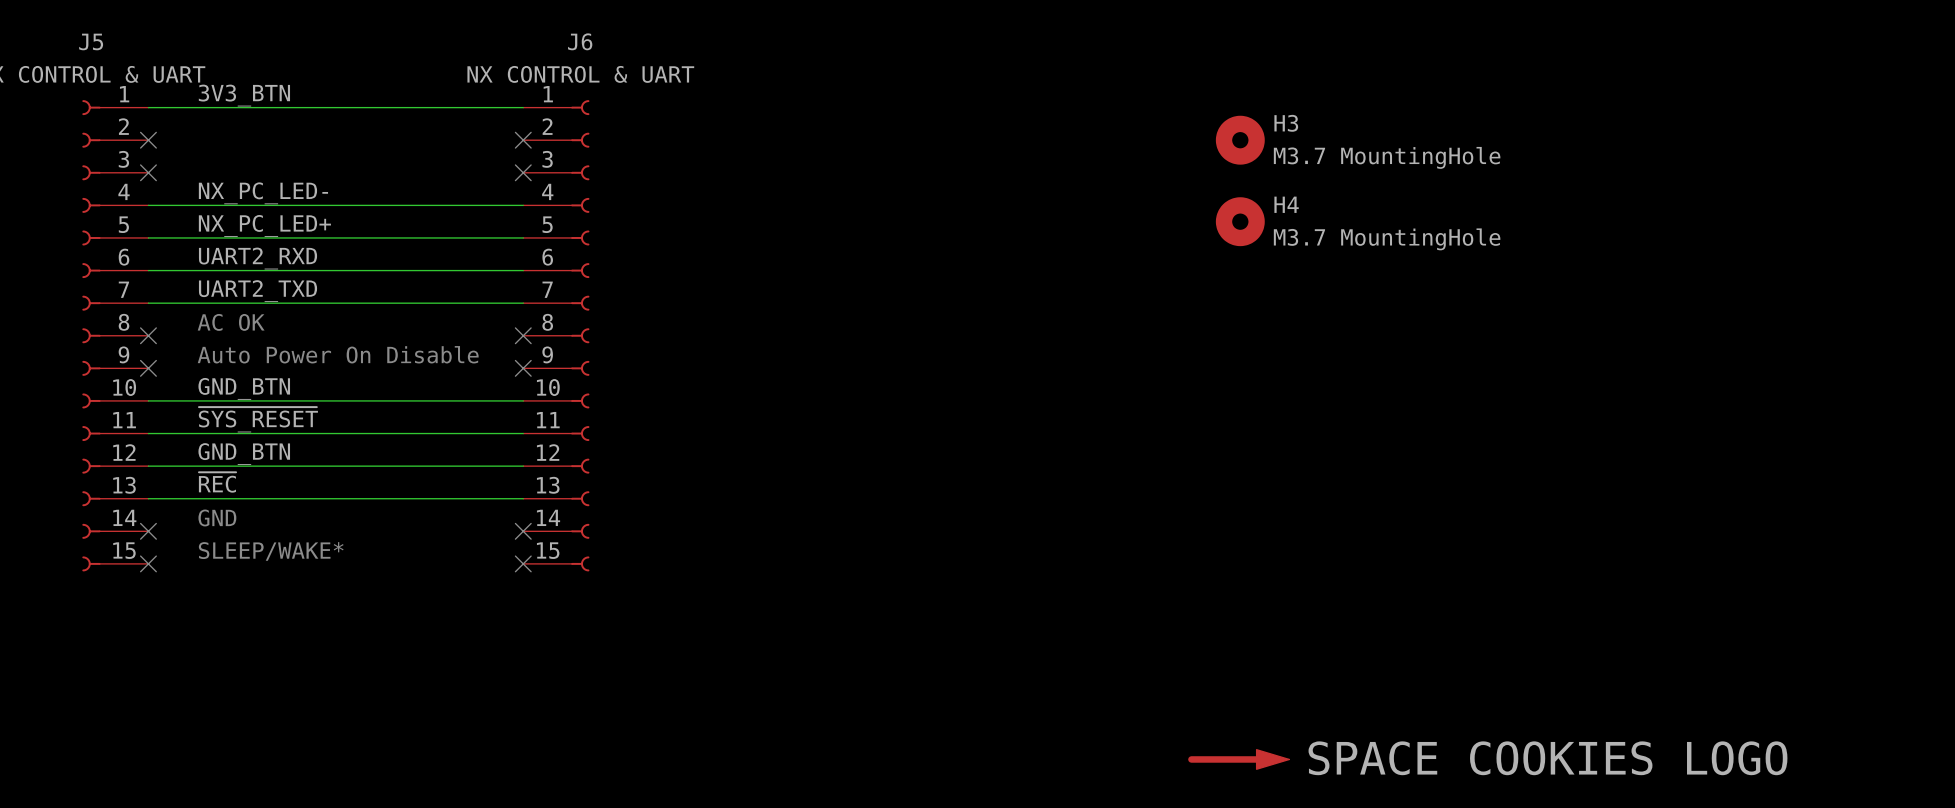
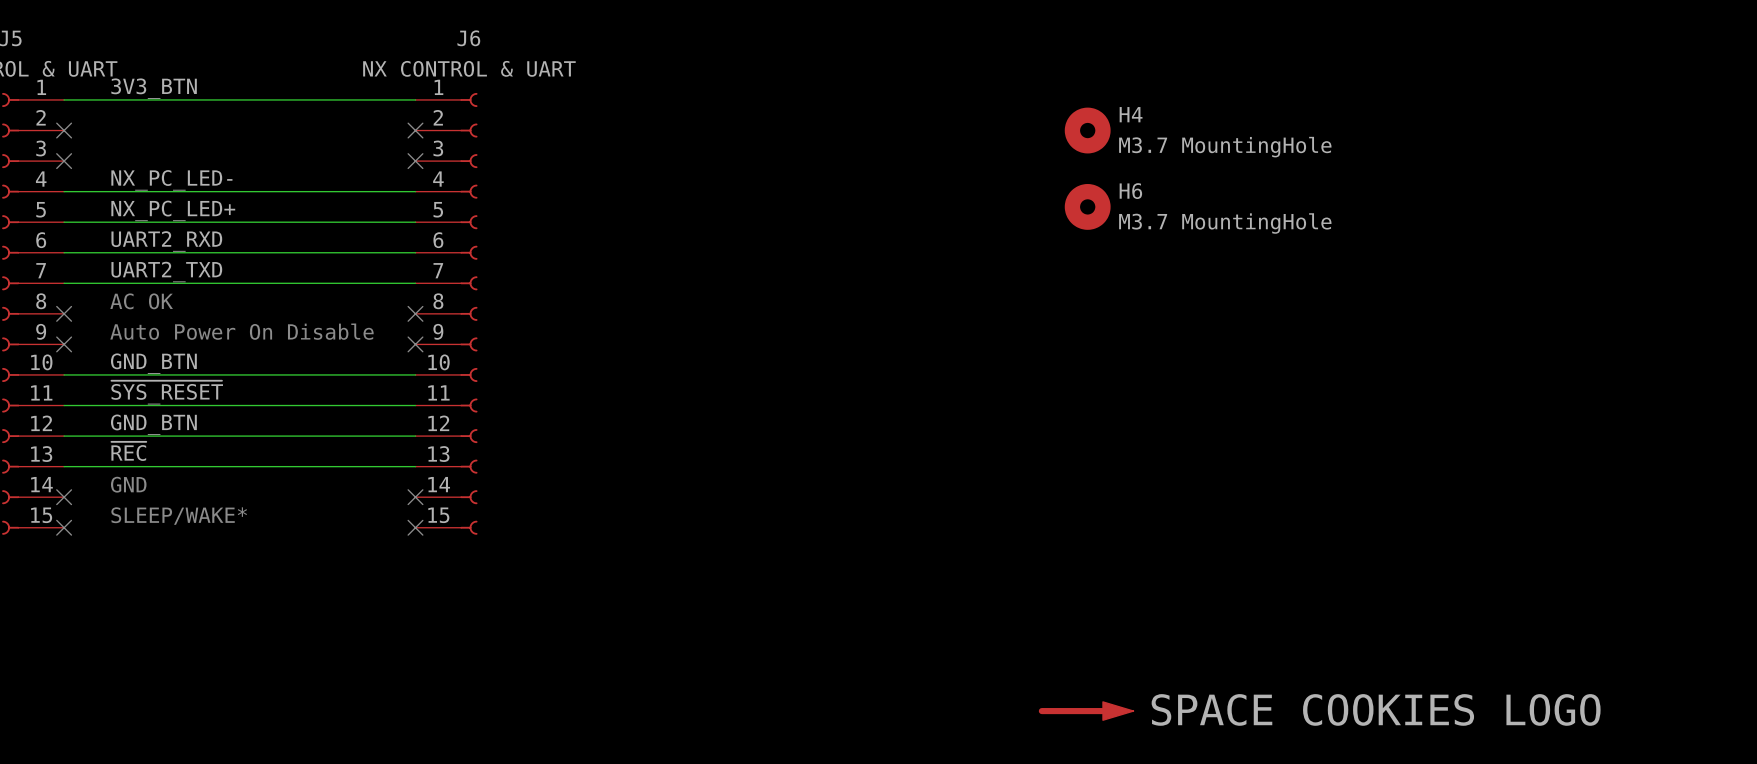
H3 name: H3 (1286, 123) -> H4 (1131, 114)
H4 name: H4 (1286, 204) -> H6 (1130, 191)

